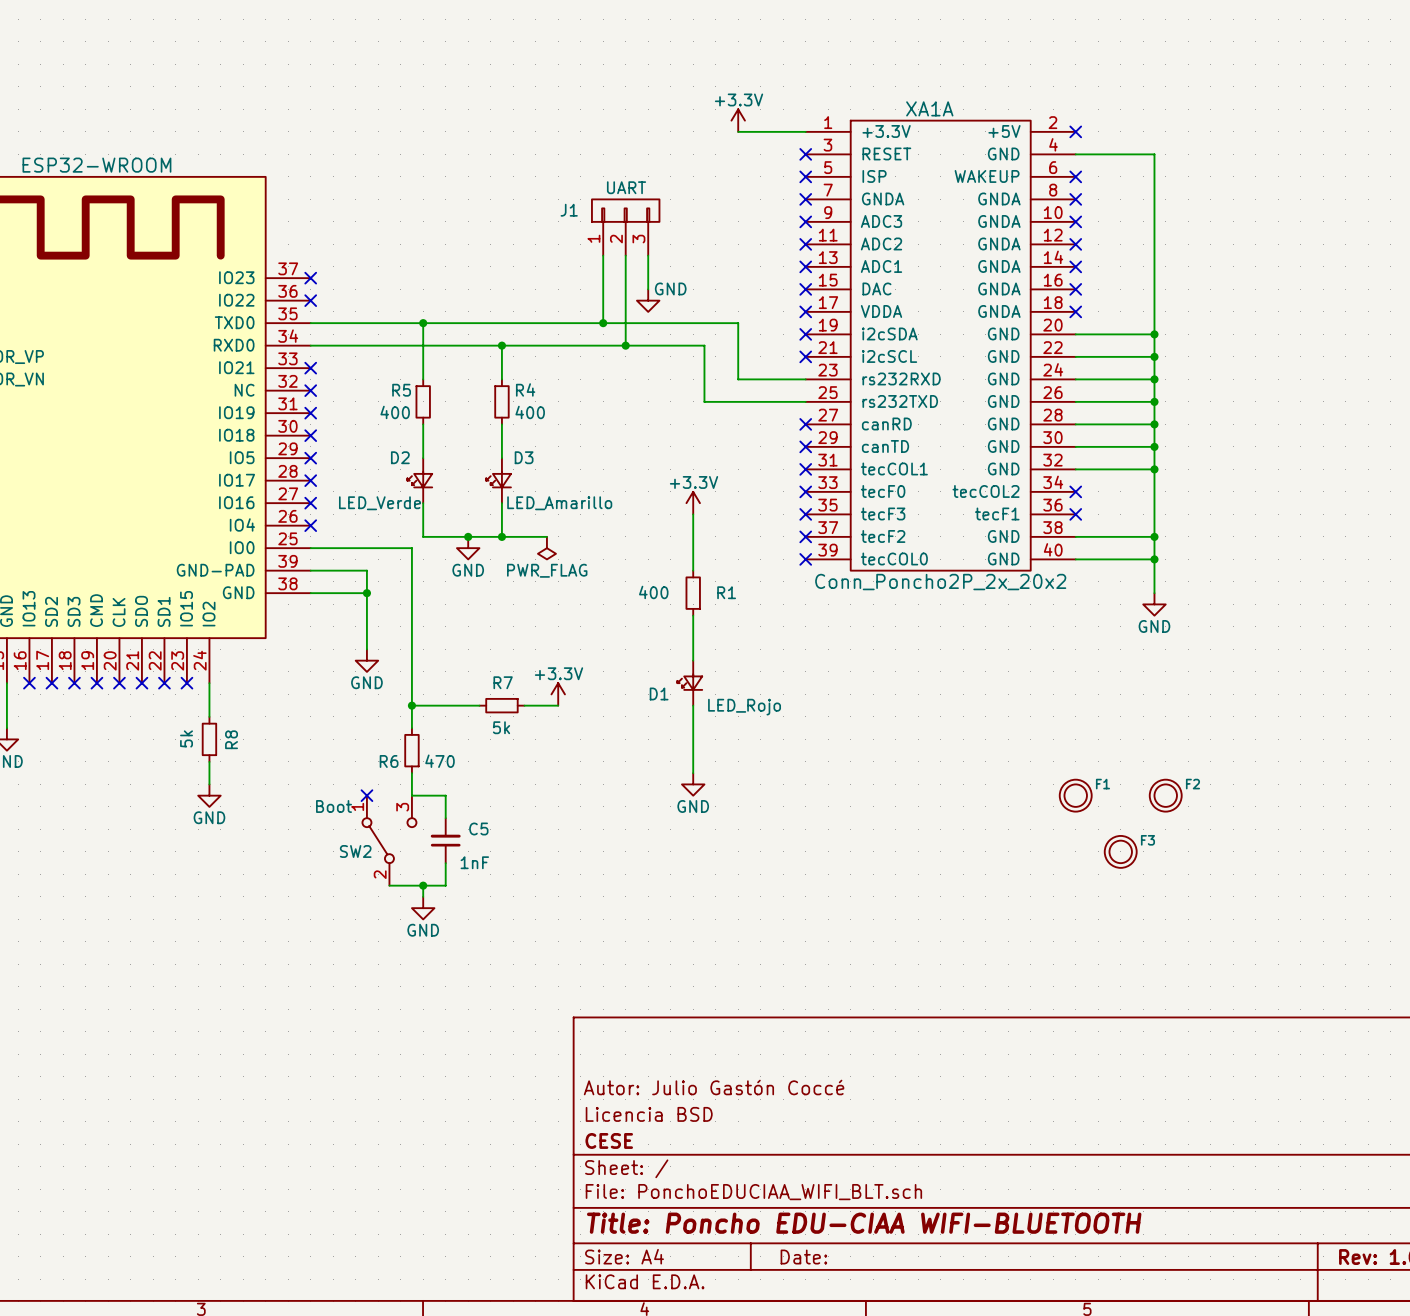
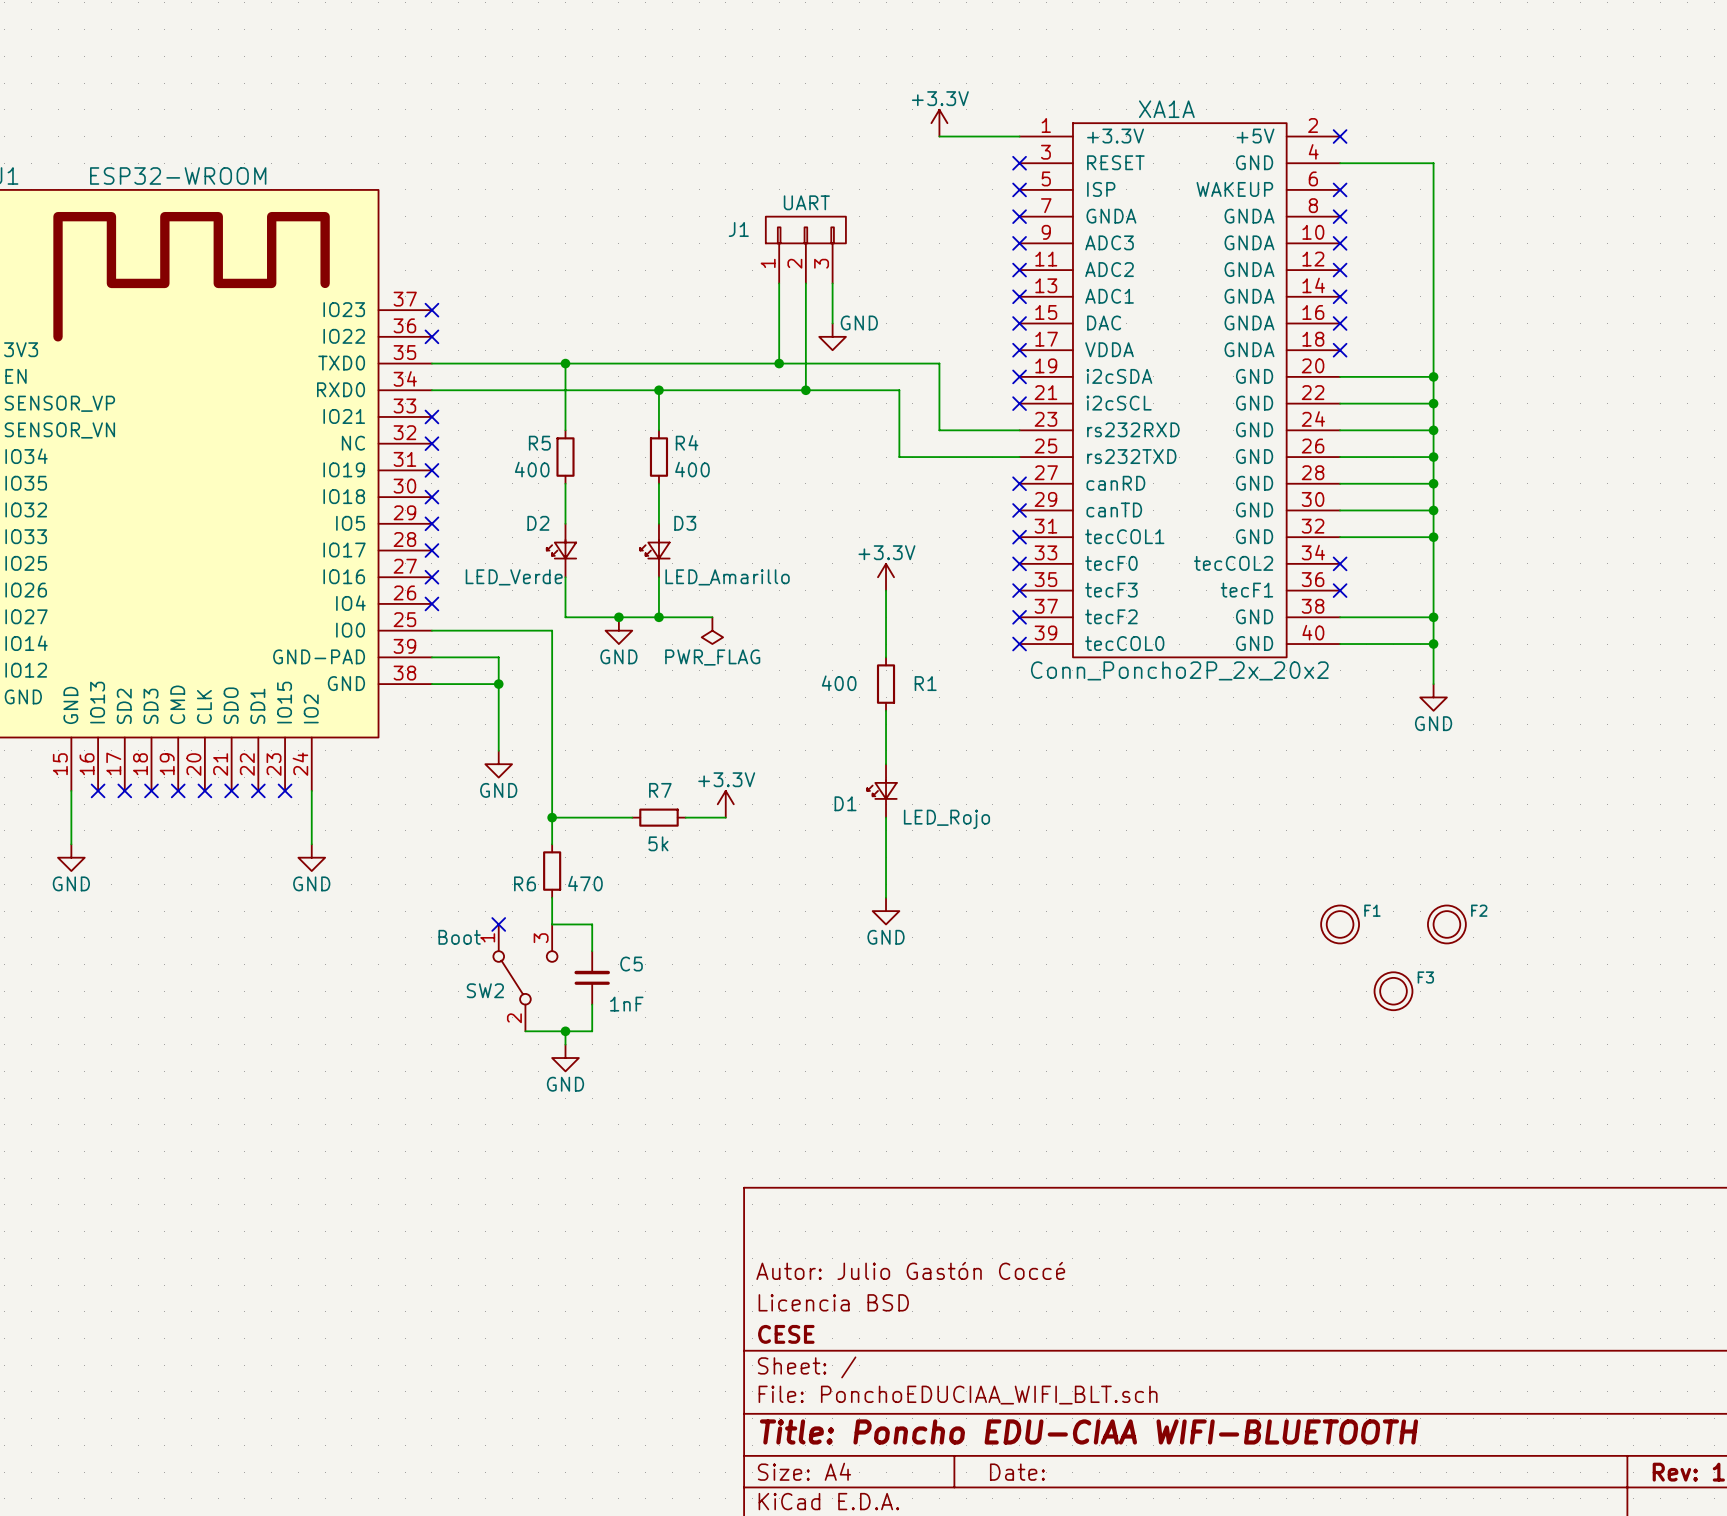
R8: 5k (209, 739) -> none
wire: (209, 761) (209, 784) -> none
power symbol position: GND (209, 795) -> GND (311, 857)

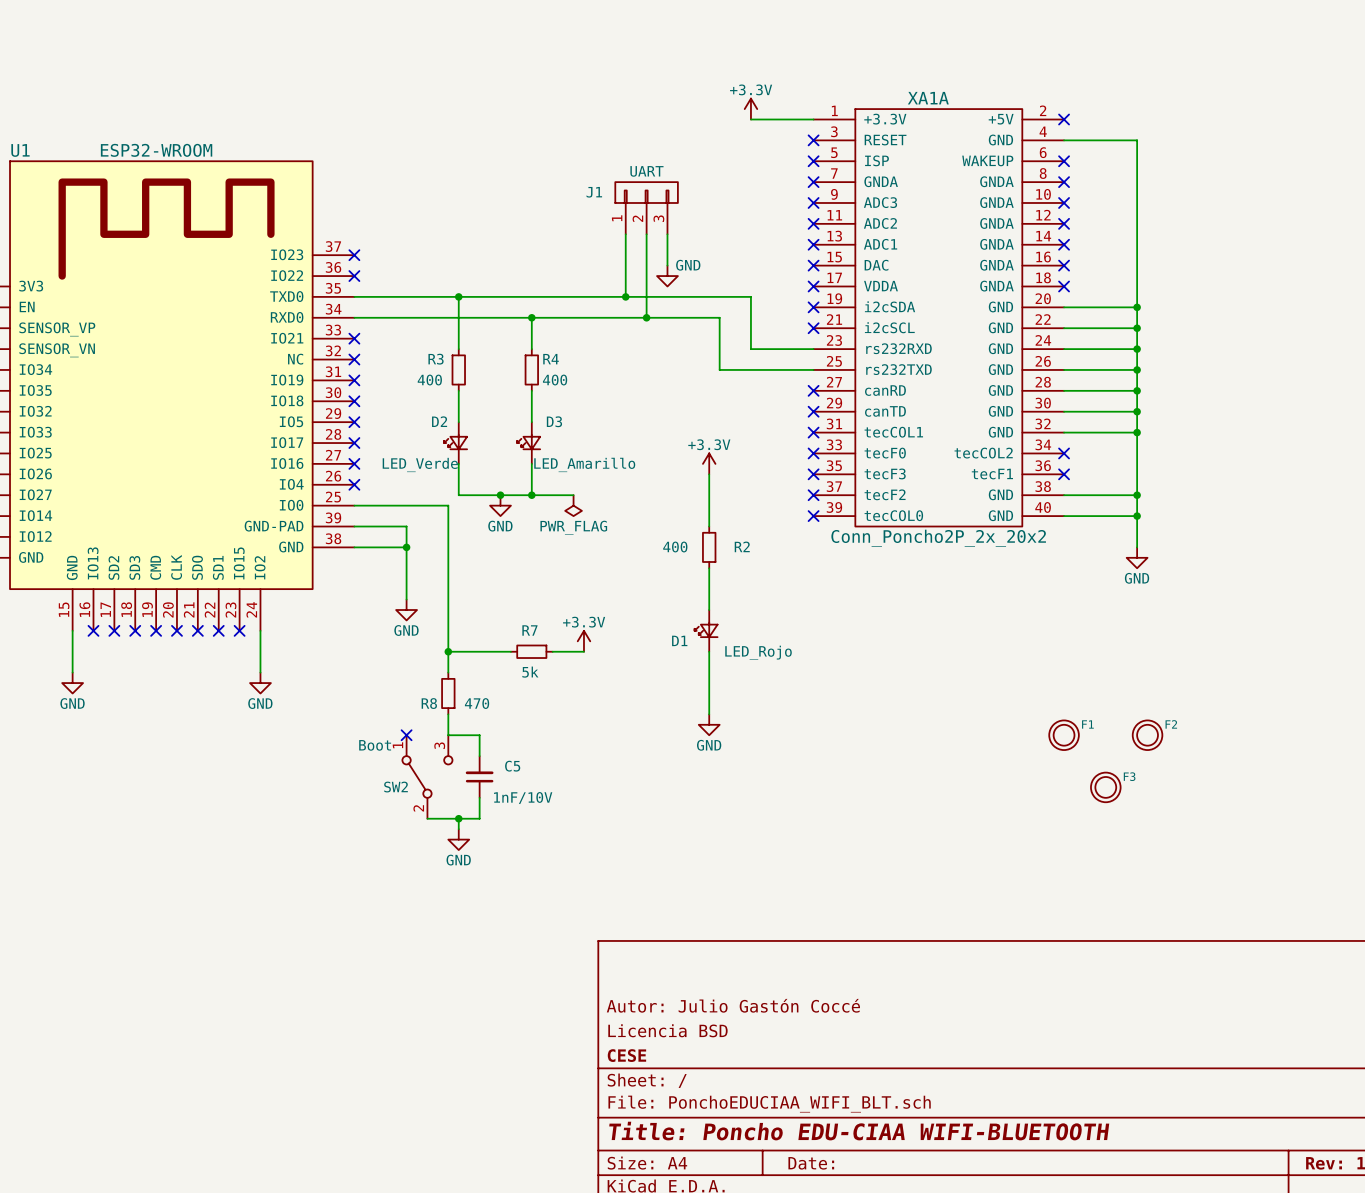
R5 name: R5 (539, 443) -> R3 (436, 359)
R1 name: R1 (925, 683) -> R2 (742, 546)
R6 name: R6 (525, 883) -> R8 (429, 703)
C5 value: 1nF (626, 1004) -> 1nF/10V (523, 798)

